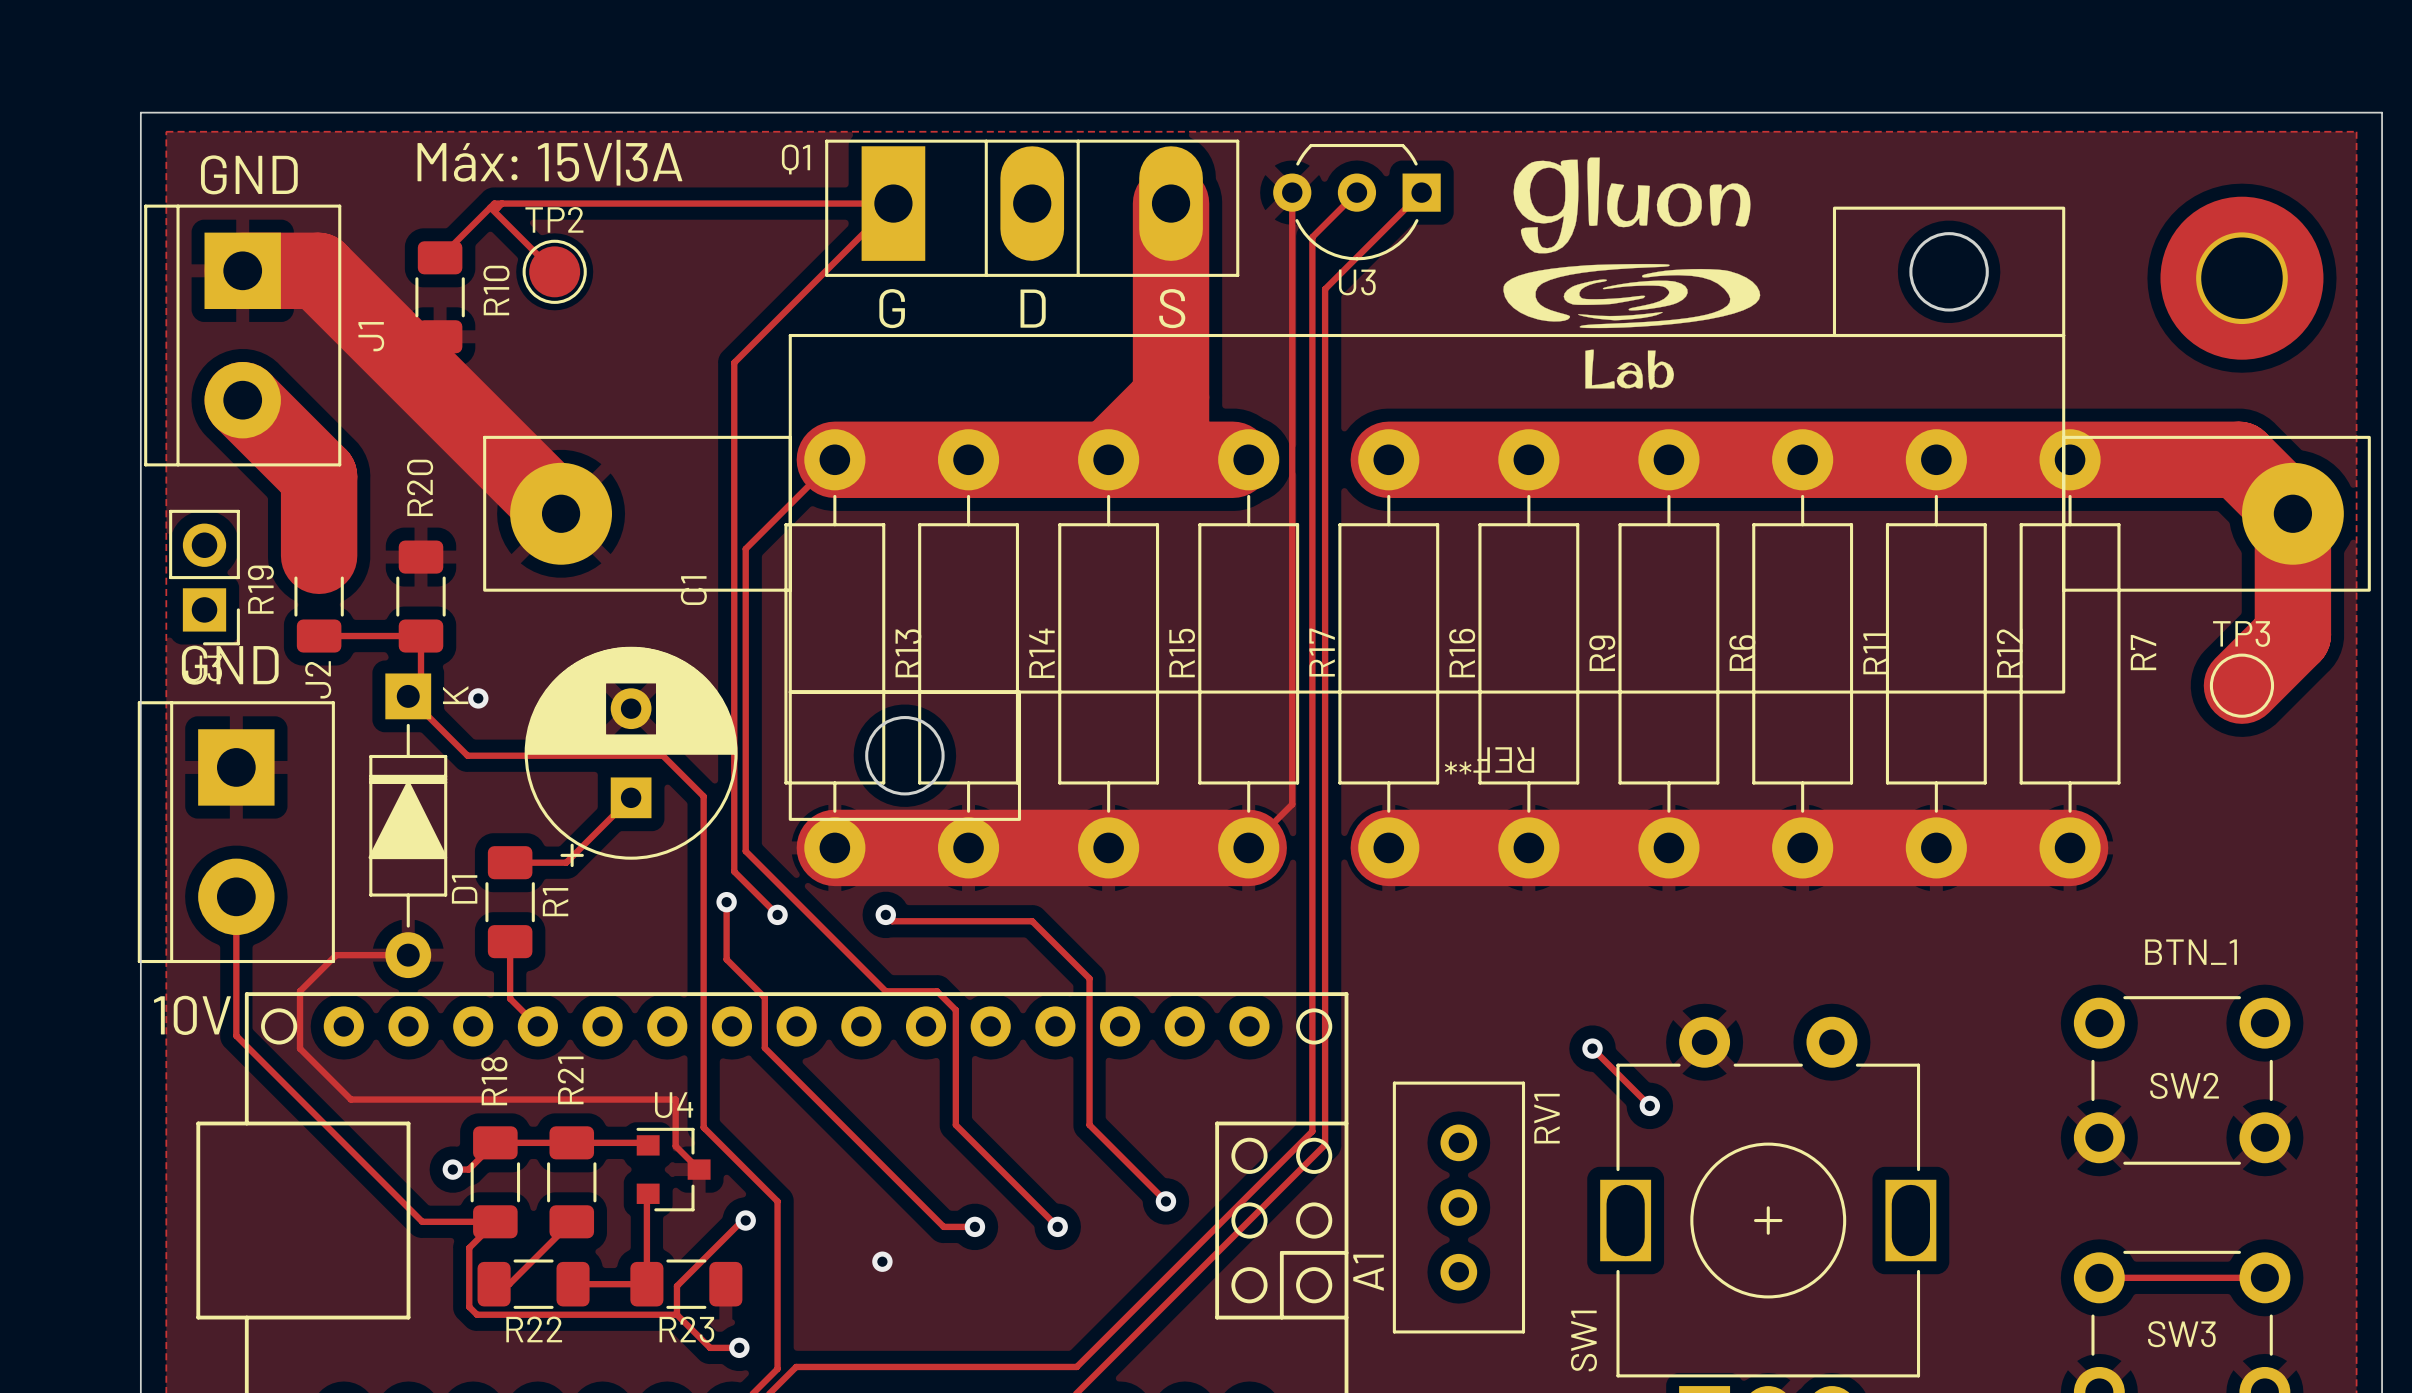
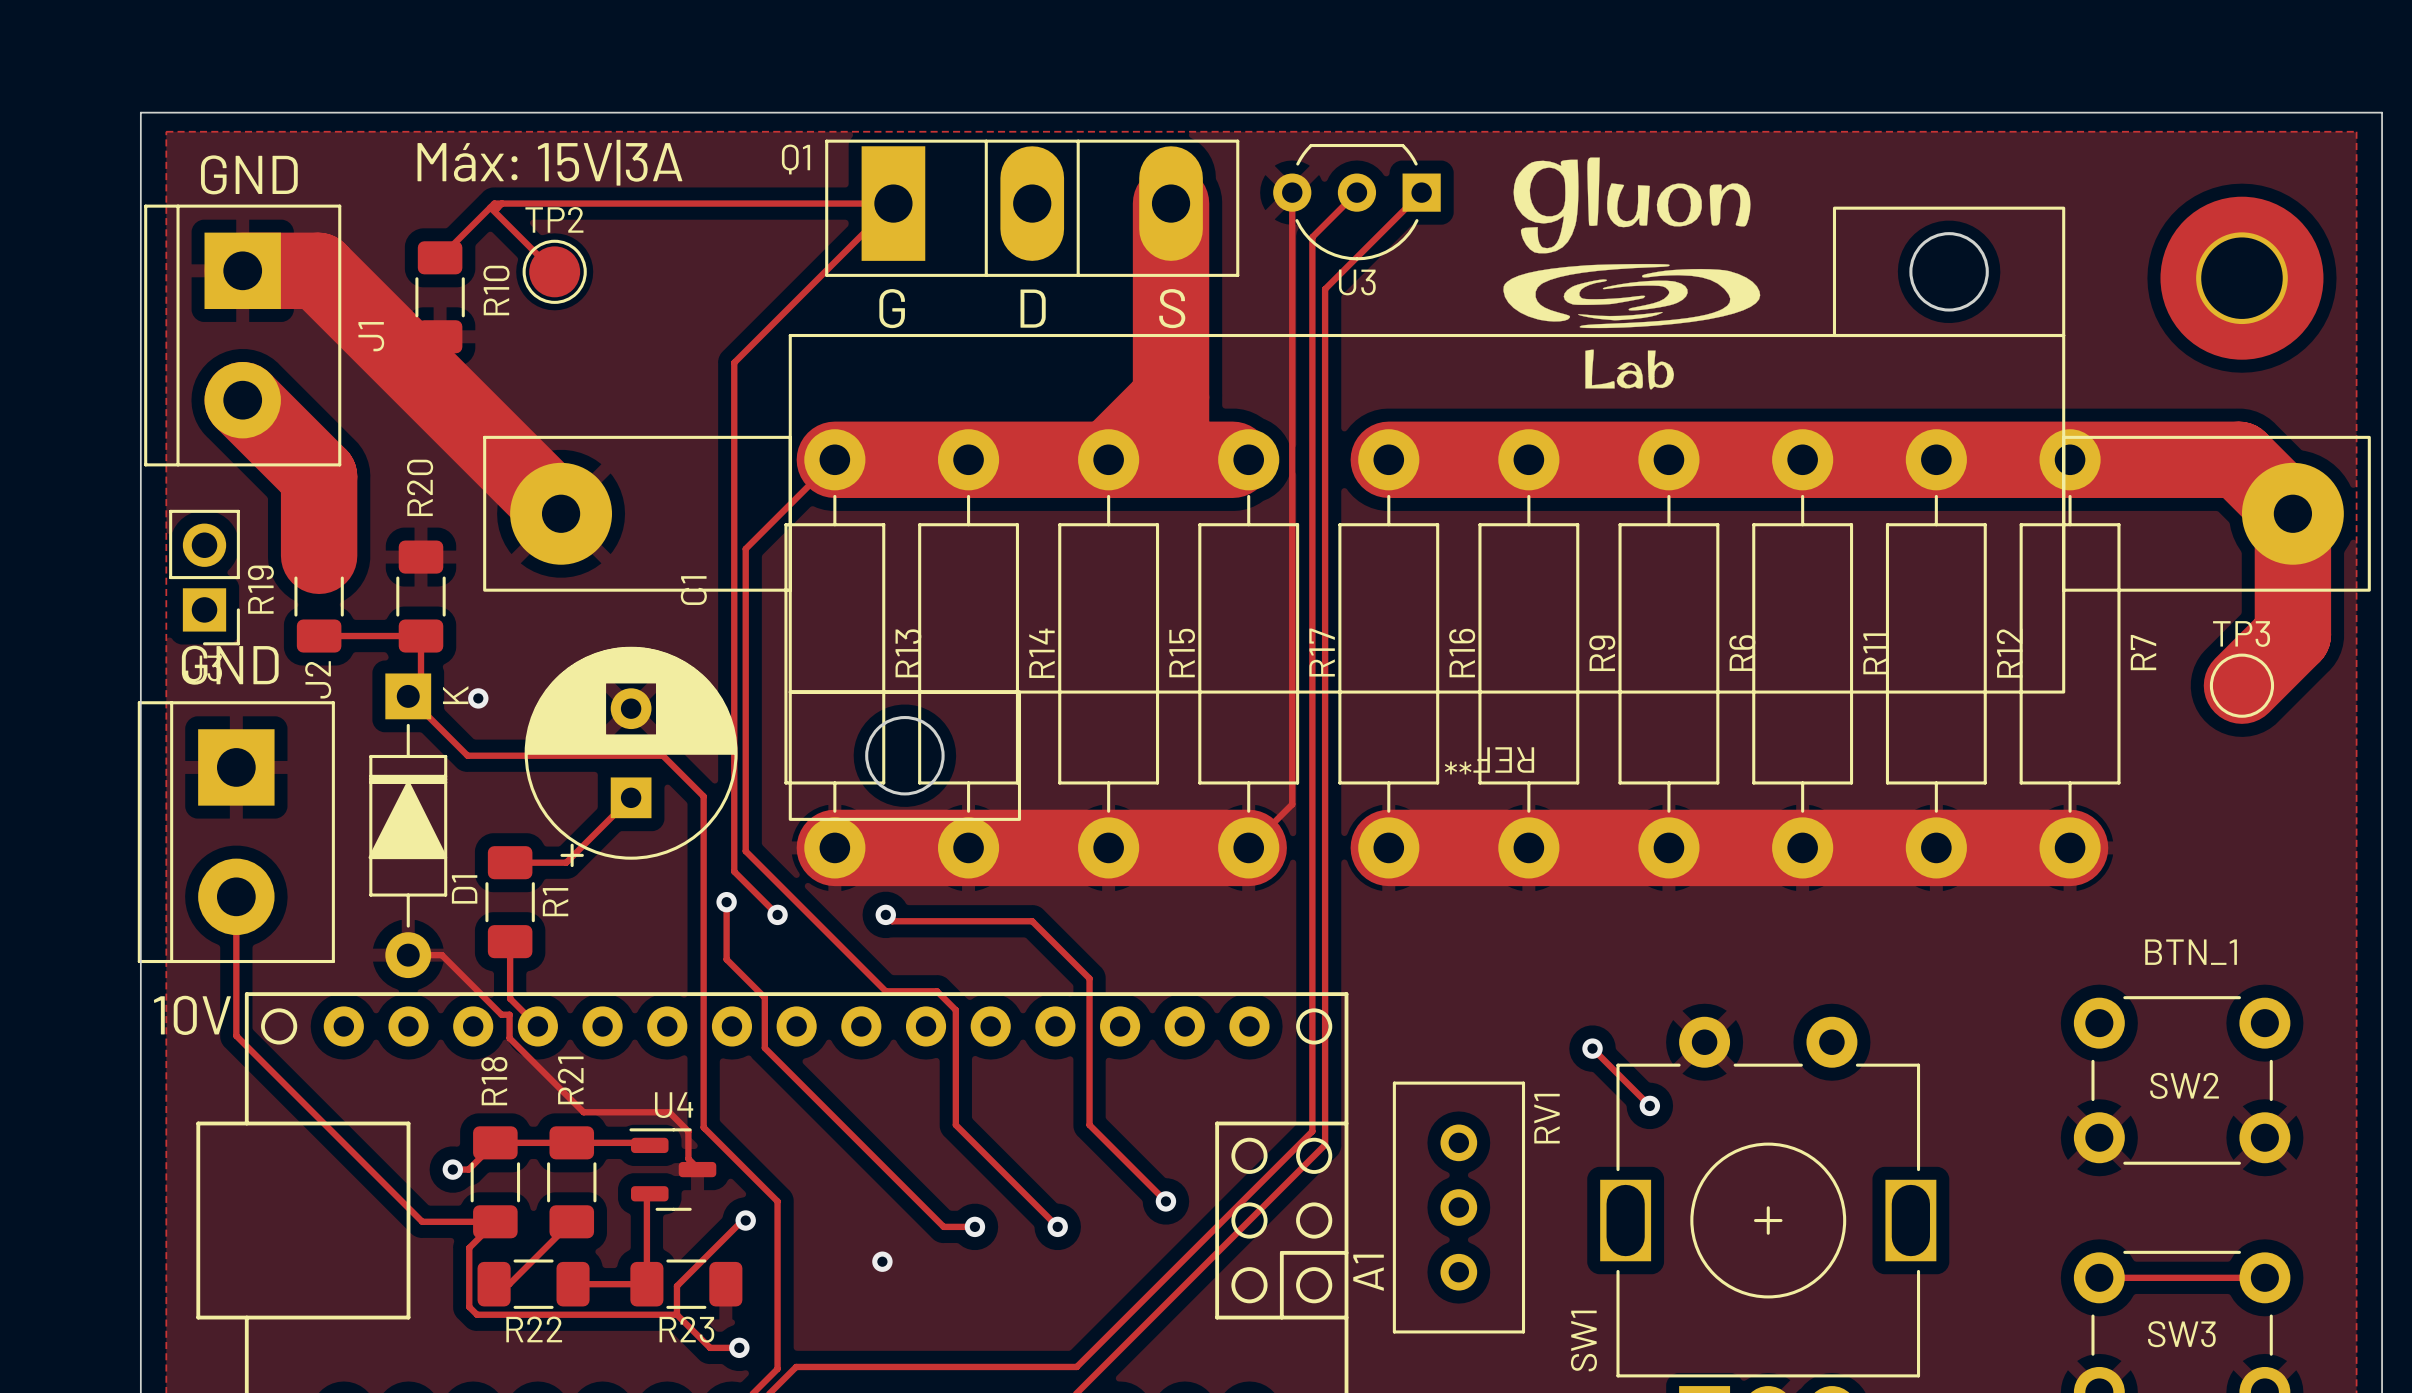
track: (408, 955) (336, 955) (300, 991) (300, 1048) (350, 1099) (675, 1099) (675, 1146) (688, 1158) -> (408, 955) (441, 955) (501, 1014) (509, 1014) (509, 1038) (583, 1112) (669, 1112) (688, 1131) (688, 1158)
U4 footprint: [636, 1127, 711, 1212] -> [629, 1128, 717, 1211]

